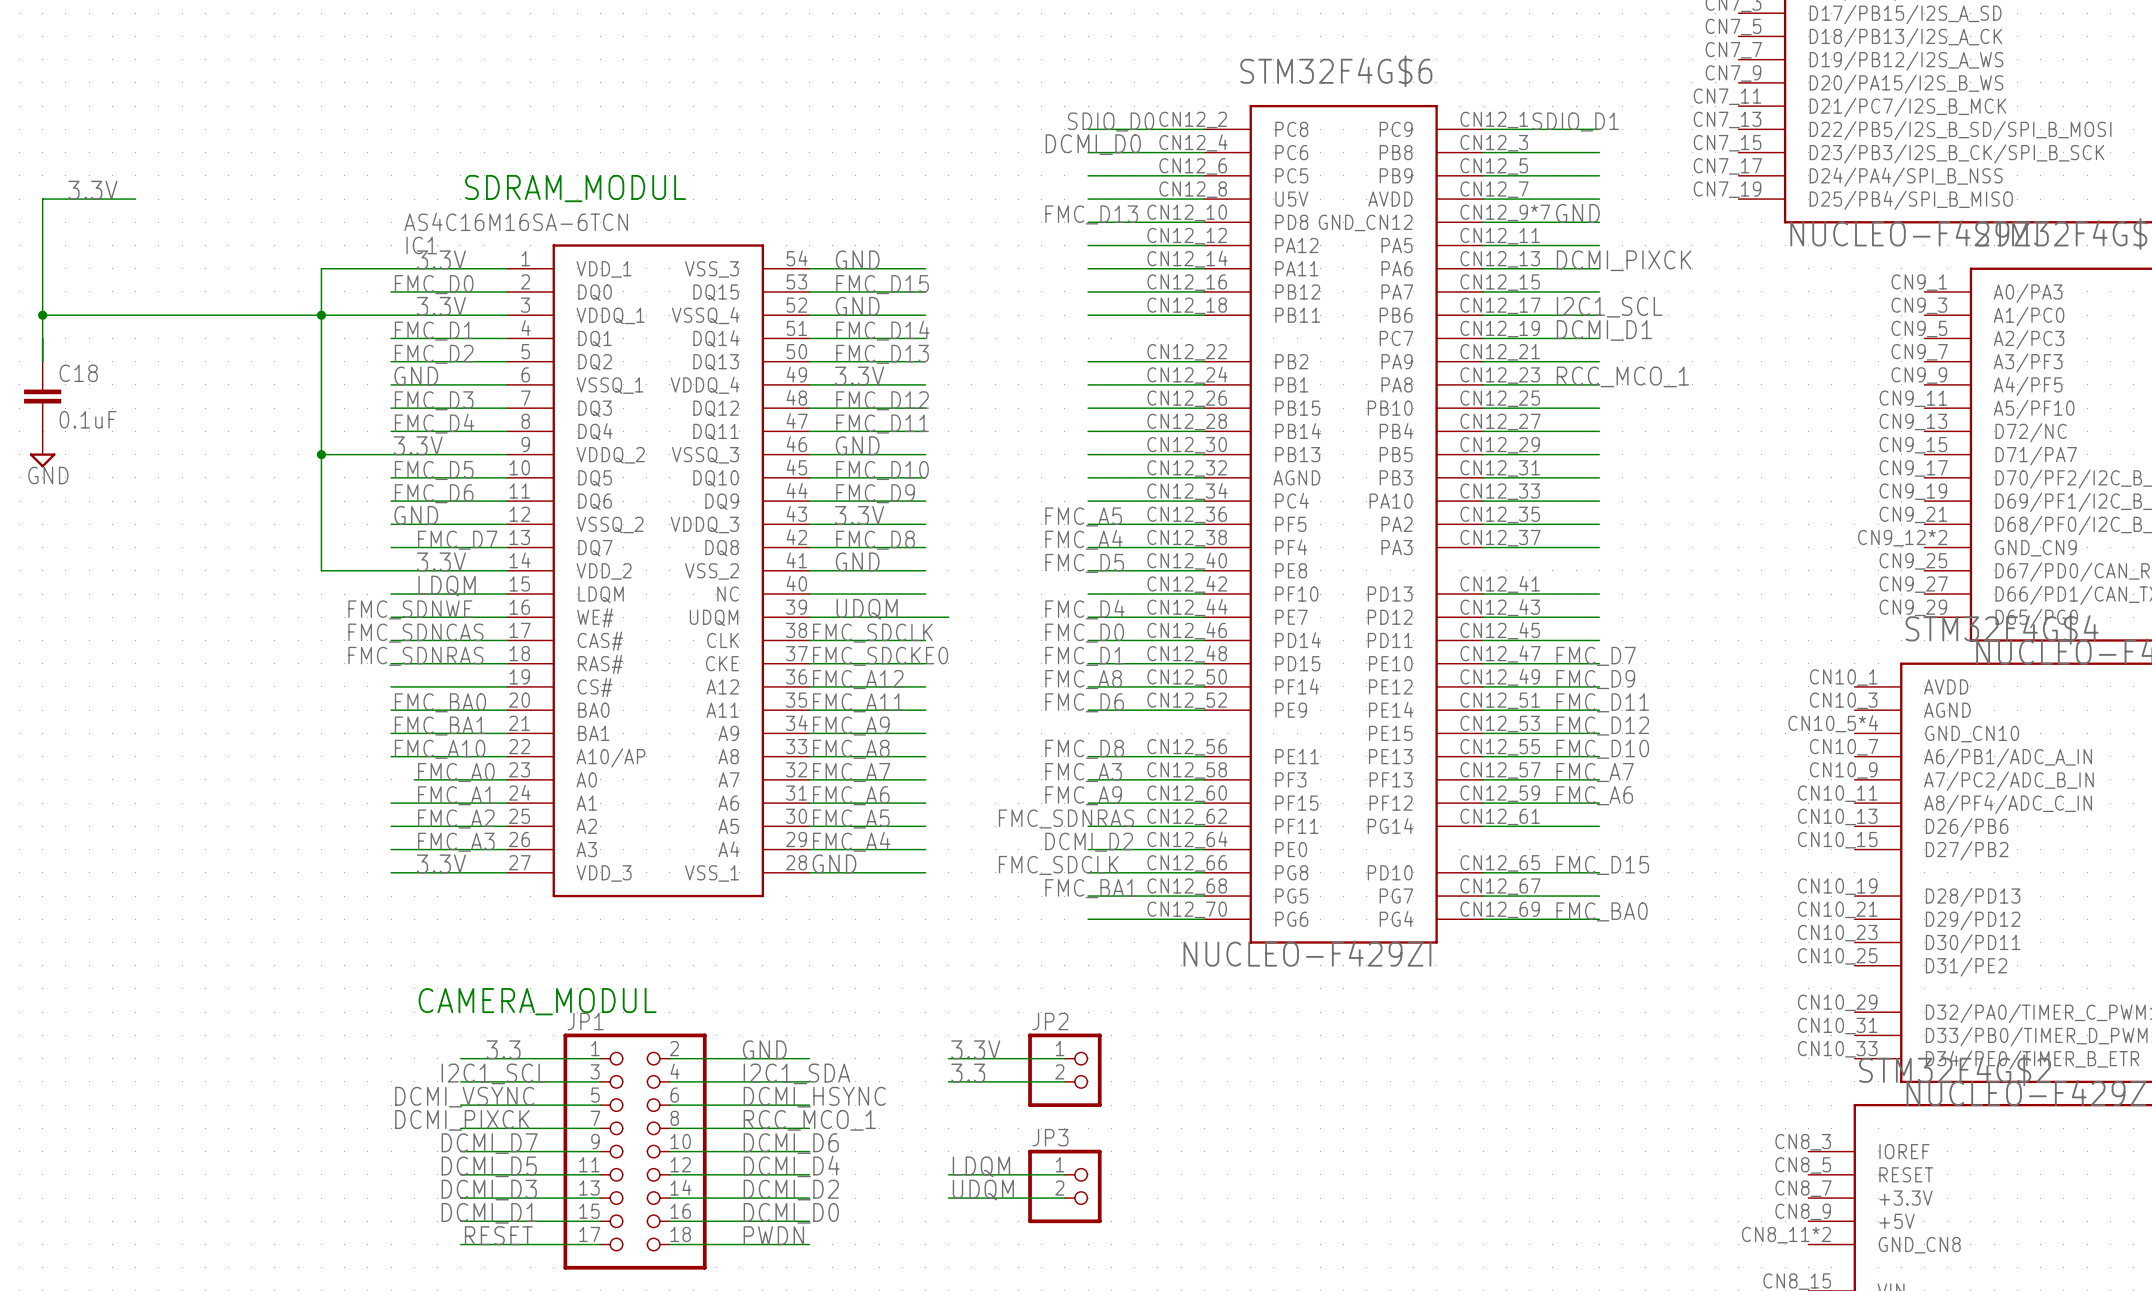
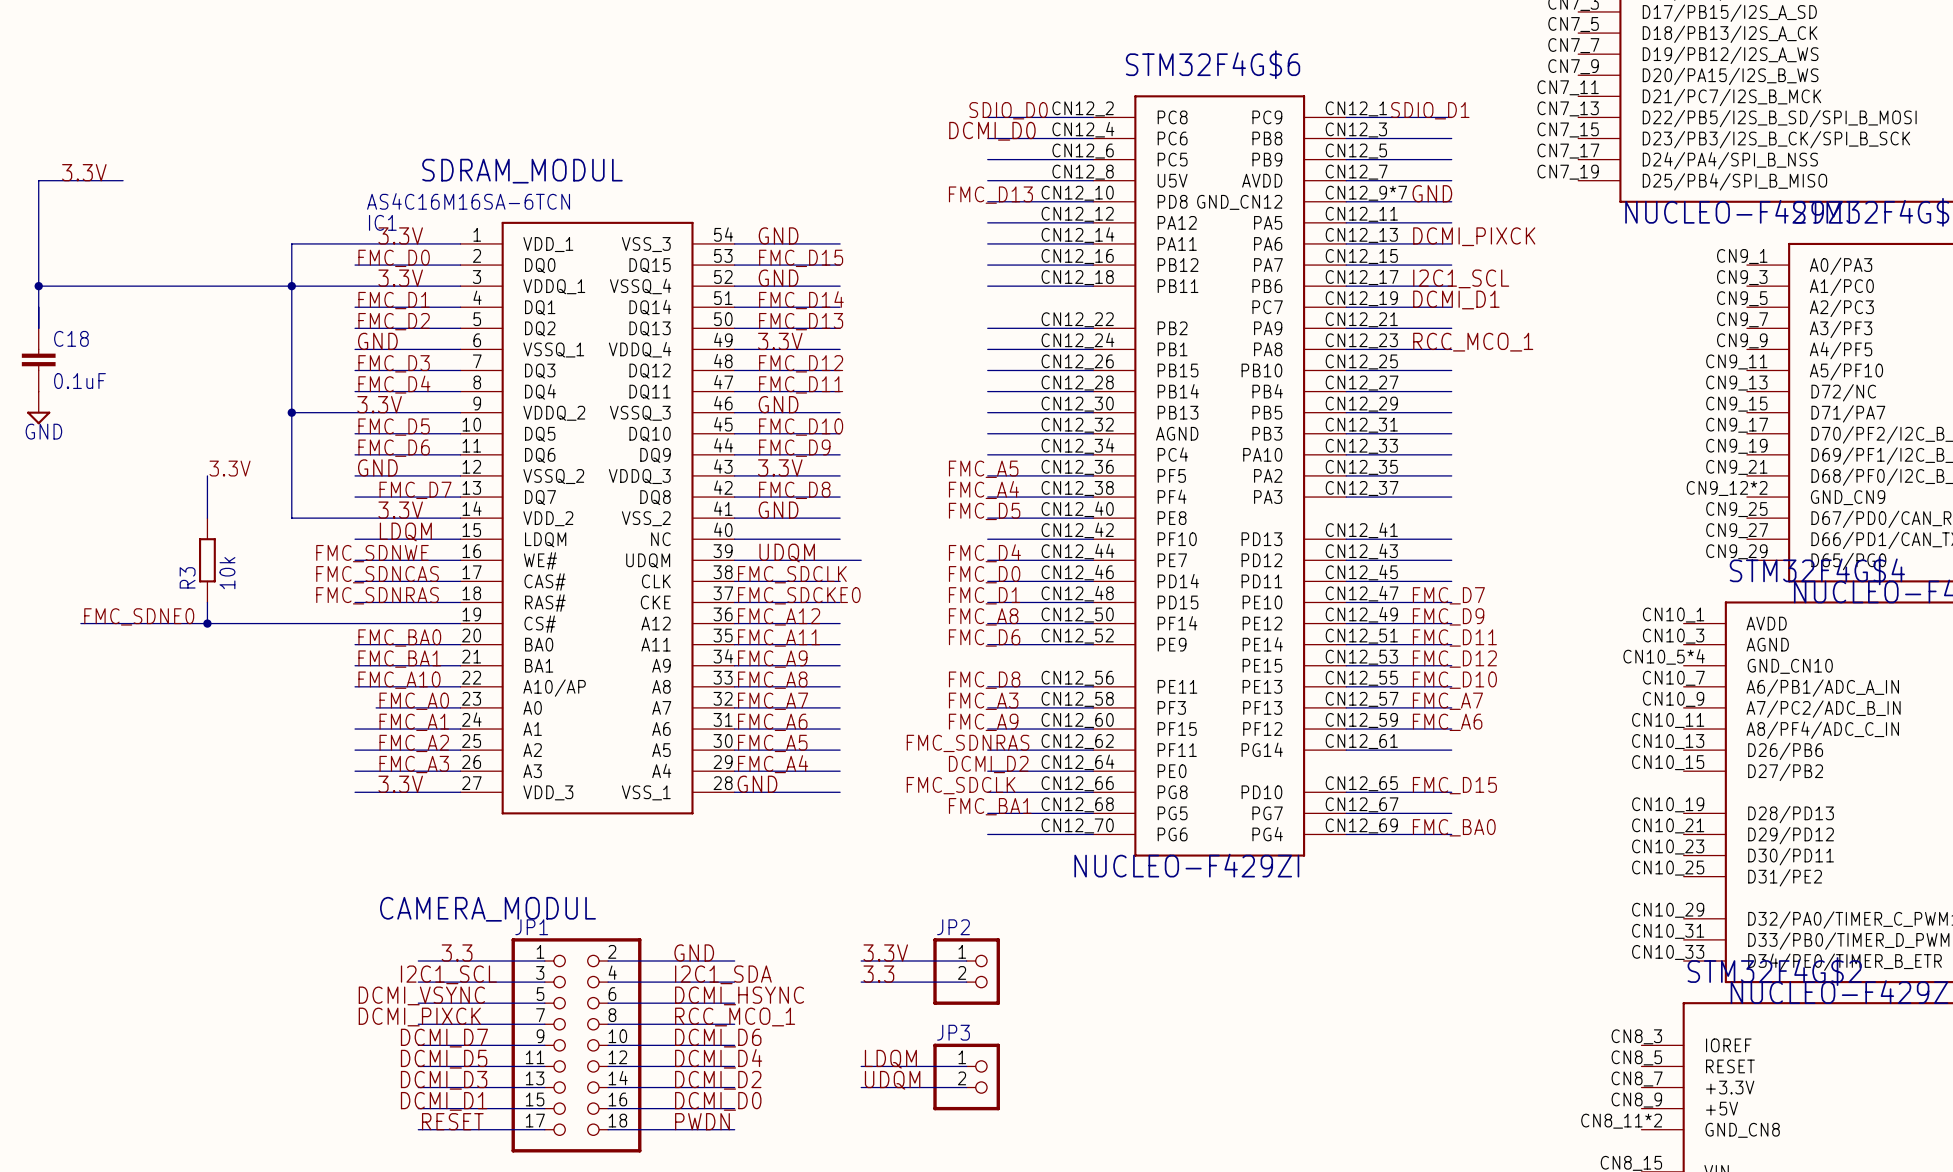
label: none -> 3.3V (230, 468)
wire: none -> (207, 475) (207, 518)
R3: none -> 10k (207, 560)
wire: none -> (207, 602) (207, 623)
label: none -> FMC_SDNE0 (139, 616)
wire: none -> (80, 623) (355, 623)
junction: none -> (207, 623)

